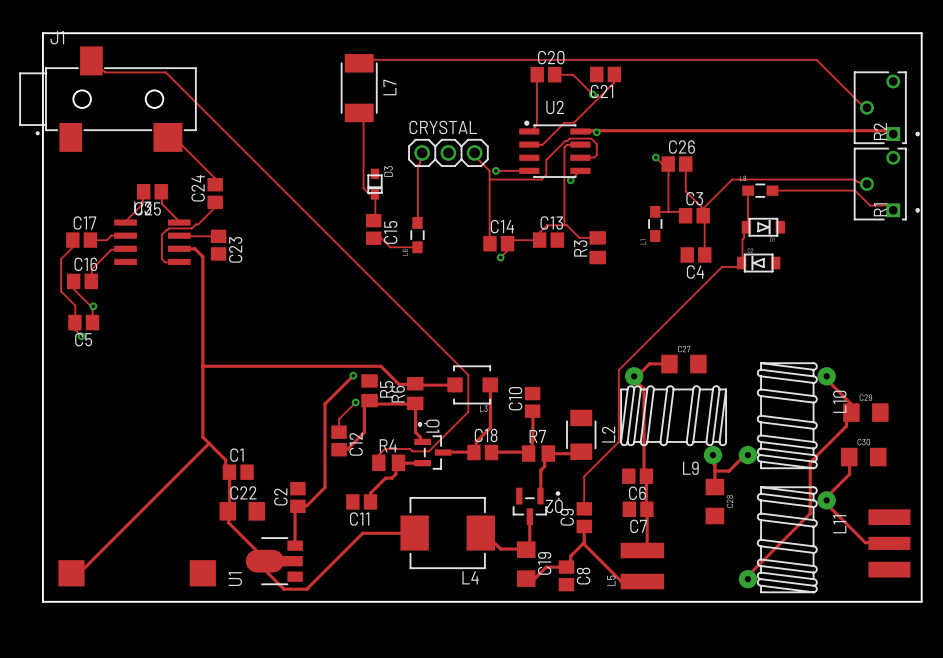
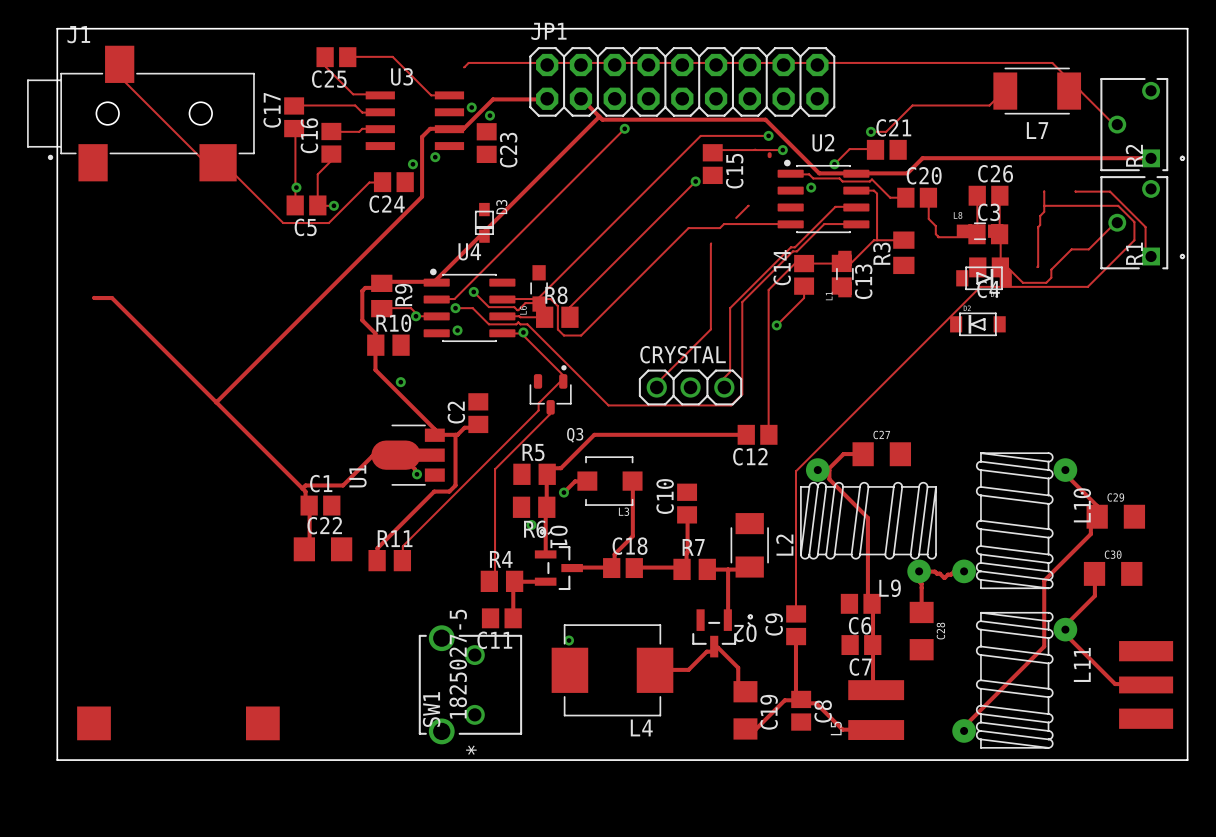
track: none -> (325, 57) (325, 66) (353, 94) (380, 95)
track: none -> (347, 57) (392, 56) (431, 95) (449, 95)
track: (91, 61) (94, 61) (105, 72) (165, 72) (468, 374) (468, 411) (428, 451) (384, 448) (379, 454) (379, 462) -> (120, 64) (120, 77) (205, 162) (218, 162)
JP1: none -> (682, 81)
track: (537, 74) (536, 125) (529, 131) -> none
C20 position: (546, 74) -> (917, 197)
track: (554, 74) (573, 74) (592, 94) -> none
C21 position: (605, 74) -> (886, 149)
track: (614, 74) (614, 82) (573, 122) (564, 122) (542, 144) (529, 144) -> none
track: none -> (1005, 91) (989, 105) (912, 105) (886, 131) (870, 131)
track: none -> (547, 98) (493, 99) (463, 128) (430, 128) (422, 136) (422, 196) (216, 402)
L7 rotation: 0° (359, 88) -> 90° clockwise (1037, 91)
L7 position: (359, 88) -> (1037, 91)
C21 name position: C21 (601, 91) -> C21 (893, 127)
track: none -> (294, 105) (355, 105) (362, 112) (380, 112)
via: none -> (471, 107)
via: (592, 94) -> none
via: none -> (489, 115)
track: none -> (599, 116) (436, 279) (436, 282) (382, 281) (377, 287) (365, 287) (362, 290) (362, 320) (375, 333) (375, 369) (435, 429) (434, 435) (457, 434) (464, 427) (474, 427) (478, 424)
track: none -> (294, 128) (295, 205)
track: none -> (380, 129) (362, 128) (359, 131) (331, 131)
track: none -> (624, 128) (454, 299) (436, 299)
via: none -> (624, 128)
track: (359, 112) (363, 117) (363, 188) (369, 193) (375, 194) (373, 220) -> none
via: none -> (870, 131)
track: none -> (768, 135) (700, 135) (537, 299) (502, 299)
via: none -> (768, 135)
track: none -> (782, 150) (714, 150) (712, 152)
via: none -> (782, 150)
track: none -> (875, 149) (849, 149) (834, 164)
track: none -> (331, 154) (330, 161) (317, 174) (317, 204) (333, 205)
track: (580, 131) (889, 130) (892, 133) -> (580, 98) (602, 119) (765, 119) (819, 173) (907, 173) (922, 158) (1150, 158)
via: (596, 132) -> none
via: none -> (435, 157)
track: (172, 137) (174, 137) (214, 177) (215, 184) -> (223, 163) (283, 223) (328, 223) (369, 182) (382, 182)
via: none -> (412, 164)
via: none -> (834, 164)
track: (580, 144) (566, 144) (564, 147) (564, 225) -> none
track: none -> (790, 173) (809, 174) (813, 178) (839, 178) (842, 181) (869, 181) (871, 179) (890, 197) (905, 197)
U2 position: (554, 149) -> (823, 196)
track: none -> (695, 181) (570, 307) (569, 317)
via: none -> (695, 181)
track: (422, 152) (421, 159) (417, 165) (417, 222) -> none
CRYSTAL position: (448, 152) -> (690, 387)
track: (474, 152) (475, 156) (489, 170) (489, 243) -> none
via: none -> (296, 187)
via: none -> (811, 187)
track: (580, 157) (594, 157) (596, 155) (596, 144) (591, 138) (569, 138) (565, 140) (546, 159) (546, 174) (541, 179) (489, 179) -> none
track: (655, 157) (662, 163) (668, 164) (668, 211) -> none
via: (655, 157) -> none
track: none -> (856, 190) (874, 190) (877, 193) (877, 240)
track: none -> (1044, 191) (1044, 211) (1040, 215) (1040, 225) (1038, 227) (1037, 267)
track: none -> (977, 195) (977, 234) (974, 237) (938, 237) (935, 234) (935, 226) (928, 218) (928, 197)
track: none -> (999, 195) (999, 234)
C26 position: (676, 164) -> (988, 195)
track: (685, 164) (685, 191) (703, 208) -> none
via: none -> (333, 205)
via: (495, 170) -> none
track: (529, 170) (495, 170) -> none
track: none -> (1044, 205) (1118, 205) (1134, 222) (1134, 240) (1087, 286) (980, 286) (795, 471) (796, 613)
track: none -> (856, 207) (835, 206) (794, 247) (790, 247) (730, 308) (730, 371) (724, 378) (724, 387)
via: (570, 180) -> none
track: (867, 184) (860, 183) (855, 179) (732, 179) (703, 208) -> (1117, 222) (1088, 249) (1071, 249) (1051, 269) (1051, 277) (1046, 282) (1022, 282) (1006, 266) (1000, 267) (999, 234)
track: none -> (790, 224) (724, 224) (719, 228) (688, 228) (581, 335) (563, 335) (557, 329) (557, 306) (550, 299) (543, 299) (539, 303) (525, 303) (517, 310) (514, 307) (488, 307) (473, 291)
track: none -> (856, 224) (824, 224) (797, 251) (792, 251) (742, 302) (742, 394) (731, 405) (608, 405) (527, 324) (520, 324) (518, 322) (516, 324) (488, 324) (472, 308) (455, 308)
C24 name position: C24 (198, 188) -> C24 (387, 204)
track: (748, 190) (748, 226) (744, 229) (742, 239) (742, 262) (737, 267) (722, 267) (618, 370) (618, 441) (584, 476) (584, 508) -> none
track: (772, 190) (855, 190) (870, 205) (889, 206) -> (1075, 191) (1110, 191) (1145, 227) (1145, 251)
track: (143, 191) (143, 203) (125, 222) -> none
C25 position: (152, 191) -> (336, 57)
track: (161, 191) (161, 203) (179, 222) -> none
C24 rotation: 0° (215, 193) -> 90° clockwise (393, 182)
C24 position: (215, 193) -> (393, 182)
track: none -> (903, 240) (874, 240) (850, 263) (841, 263)
track: none -> (711, 243) (710, 329) (657, 383) (656, 387)
track: (215, 202) (214, 207) (191, 228) (169, 228) (161, 234) (161, 259) (165, 262) (179, 261) -> none
track: (655, 211) (681, 211) (685, 215) -> none
track: none -> (841, 263) (794, 263) (768, 289) (768, 434)
C3 position: (694, 215) -> (988, 234)
track: (703, 215) (704, 254) -> none
C17 name position: C17 (84, 223) -> C17 (272, 110)
C14 name position: C14 (502, 226) -> C14 (782, 267)
C15 position: (373, 229) -> (712, 164)
track: none -> (804, 286) (804, 298) (776, 325)
track: (125, 235) (111, 235) (106, 240) (90, 240) -> none
track: (179, 235) (218, 236) -> none
via: none -> (473, 291)
track: (597, 237) (579, 237) (566, 225) (547, 225) (540, 232) (539, 240) (510, 240) (506, 244) (506, 251) (500, 257) -> none
track: (373, 238) (380, 237) (390, 247) (417, 247) -> none
track: (72, 240) (72, 247) (61, 259) (61, 291) (75, 305) (75, 330) (81, 336) -> none
C17 rotation: 0° (81, 240) -> 90° clockwise (294, 117)
C17 position: (81, 240) -> (294, 117)
C13 rotation: 0° (548, 240) -> 90° clockwise (841, 274)
C13 position: (548, 240) -> (841, 274)
R9: none -> (381, 295)
track: none -> (94, 297) (112, 298) (305, 491) (305, 500) (309, 505) (309, 543) (304, 549)
U3 position: (152, 242) -> (414, 120)
C14 rotation: 0° (498, 243) -> 90° clockwise (804, 274)
C14 position: (498, 243) -> (804, 274)
C23 position: (218, 245) -> (486, 143)
R3 position: (597, 247) -> (903, 252)
track: (125, 248) (111, 249) (91, 269) (91, 281) -> none
track: (179, 248) (194, 248) (202, 256) (202, 437) (225, 460) (225, 467) (229, 472) (228, 523) (264, 558) (265, 570) (284, 589) (306, 589) (362, 533) (414, 533) -> none
U4: none -> (469, 305)
track: none -> (381, 308) (410, 308) (419, 316) (436, 316)
via: none -> (455, 308)
C4 position: (696, 254) -> (989, 267)
via: none -> (416, 316)
track: none -> (502, 316) (544, 317)
R8: none -> (557, 317)
via: (500, 257) -> none
via: none -> (776, 325)
C16 name position: C16 (85, 264) -> C16 (309, 135)
via: none -> (457, 330)
via: none -> (523, 332)
track: none -> (502, 333) (521, 333) (562, 375) (563, 381) (560, 381) (538, 403) (538, 410) (402, 546) (402, 560)
R10: none -> (388, 345)
track: (73, 281) (73, 289) (92, 307) (92, 322) -> none
C16 rotation: 0° (82, 281) -> 90° clockwise (331, 142)
C16 position: (82, 281) -> (331, 142)
via: (93, 306) -> none
via: none -> (400, 382)
Q3: none -> (550, 389)
C5 position: (83, 322) -> (306, 205)
track: none -> (550, 407) (549, 414) (495, 469) (495, 575) (489, 580)
via: (81, 336) -> none
track: (654, 363) (649, 363) (637, 375) (634, 376) (637, 376) (637, 382) (644, 389) (644, 473) (646, 476) (647, 545) (642, 550) -> (843, 454) (828, 469) (824, 470) (829, 470) (829, 479) (867, 517) (867, 597) (873, 604) (873, 686) (876, 690)
track: (202, 366) (380, 366) (399, 384) (445, 385) -> (563, 492) (575, 481)
track: (353, 375) (336, 393) -> (455, 434) (455, 485) (449, 491) (434, 491)
via: (353, 375) -> none
track: none -> (417, 474) (414, 469) (401, 456) (372, 456) (343, 485) (305, 485) (302, 488)
via: none -> (417, 474)
R5 name position: R5 (386, 389) -> R5 (533, 452)
R5 rotation: 0° (369, 390) -> 90° clockwise (534, 474)
R5 position: (369, 390) -> (534, 474)
R6 rotation: 0° (415, 393) -> 90° clockwise (534, 507)
via: none -> (563, 492)
R6 name position: R6 (398, 394) -> R6 (535, 529)
track: (355, 402) (339, 419) (339, 432) -> none
via: (355, 402) -> none
track: (324, 404) (324, 487) (306, 505) (298, 505) (295, 508) (295, 545) -> (420, 505) (377, 548) (377, 560)
via: none -> (531, 525)
C12 rotation: 0° (339, 440) -> 90° clockwise (757, 434)
C12 position: (339, 440) -> (757, 434)
track: (422, 441) (415, 432) (415, 403) (373, 404) (369, 400) (364, 405) (364, 432) (347, 448) (339, 449) -> (545, 554) (547, 474) (552, 468) (560, 468) (594, 434) (746, 434)
track: (209, 443) (79, 572) (71, 573) -> none
R11: none -> (389, 560)
track: (548, 453) (544, 456) (544, 466) (540, 470) (540, 496) -> none
track: none -> (728, 569) (727, 620)
track: (744, 455) (729, 471) (714, 471) -> (960, 571) (954, 571) (943, 577) (934, 571) (925, 571)
track: (397, 463) (395, 474) (391, 478) (385, 478) (370, 493) (370, 501) -> (513, 582) (513, 618)
C1 position: (238, 472) -> (320, 505)
C6 position: (637, 476) -> (860, 603)
C2 position: (297, 497) -> (478, 413)
C11 position: (361, 501) -> (501, 618)
track: none -> (796, 636) (795, 699) (801, 699)
Q2 position: (536, 506) -> (722, 633)
via: none -> (569, 640)
C7 position: (638, 509) -> (861, 645)
C22 position: (242, 511) -> (322, 549)
track: (529, 516) (529, 545) (526, 549) (500, 549) (484, 533) (480, 533) -> none
C9 position: (584, 517) -> (796, 625)
track: (584, 526) (584, 542) (570, 556) (570, 561) (566, 567) (546, 567) (534, 578) (526, 578) -> none
track: none -> (655, 670) (688, 669) (706, 651) (712, 651) (714, 646) (717, 647) (738, 667) (738, 684) (745, 691)
L4 position: (447, 533) -> (612, 670)
SW1: none -> 1825027-5 (470, 684)
track: (583, 543) (621, 581) (642, 581) -> none
track: none -> (801, 699) (784, 700) (755, 729) (745, 728)
track: none -> (801, 699) (806, 703) (816, 703) (842, 729) (876, 730)
U1 position: (274, 561) -> (408, 455)
C19 position: (526, 564) -> (745, 710)
L5 position: (642, 566) -> (876, 710)
C8 position: (566, 575) -> (801, 710)

